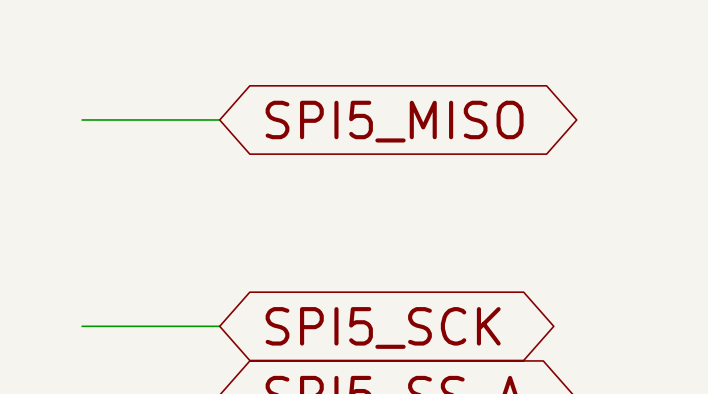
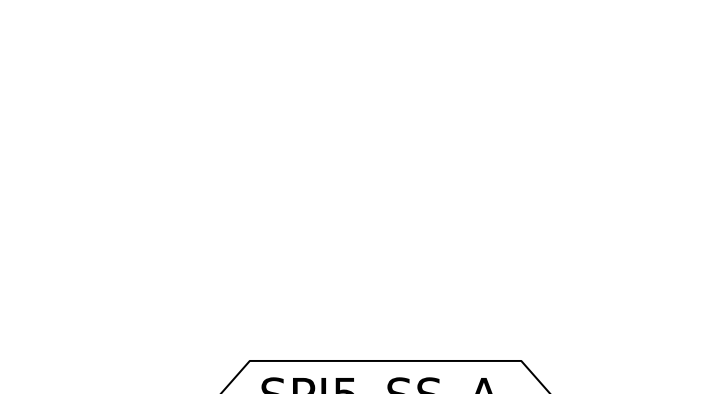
wire: (82, 119) (219, 119) -> none
global label: SPI5_MISO (394, 121) -> none
wire: (82, 326) (219, 326) -> none
global label: SPI5_SCK (383, 327) -> none

